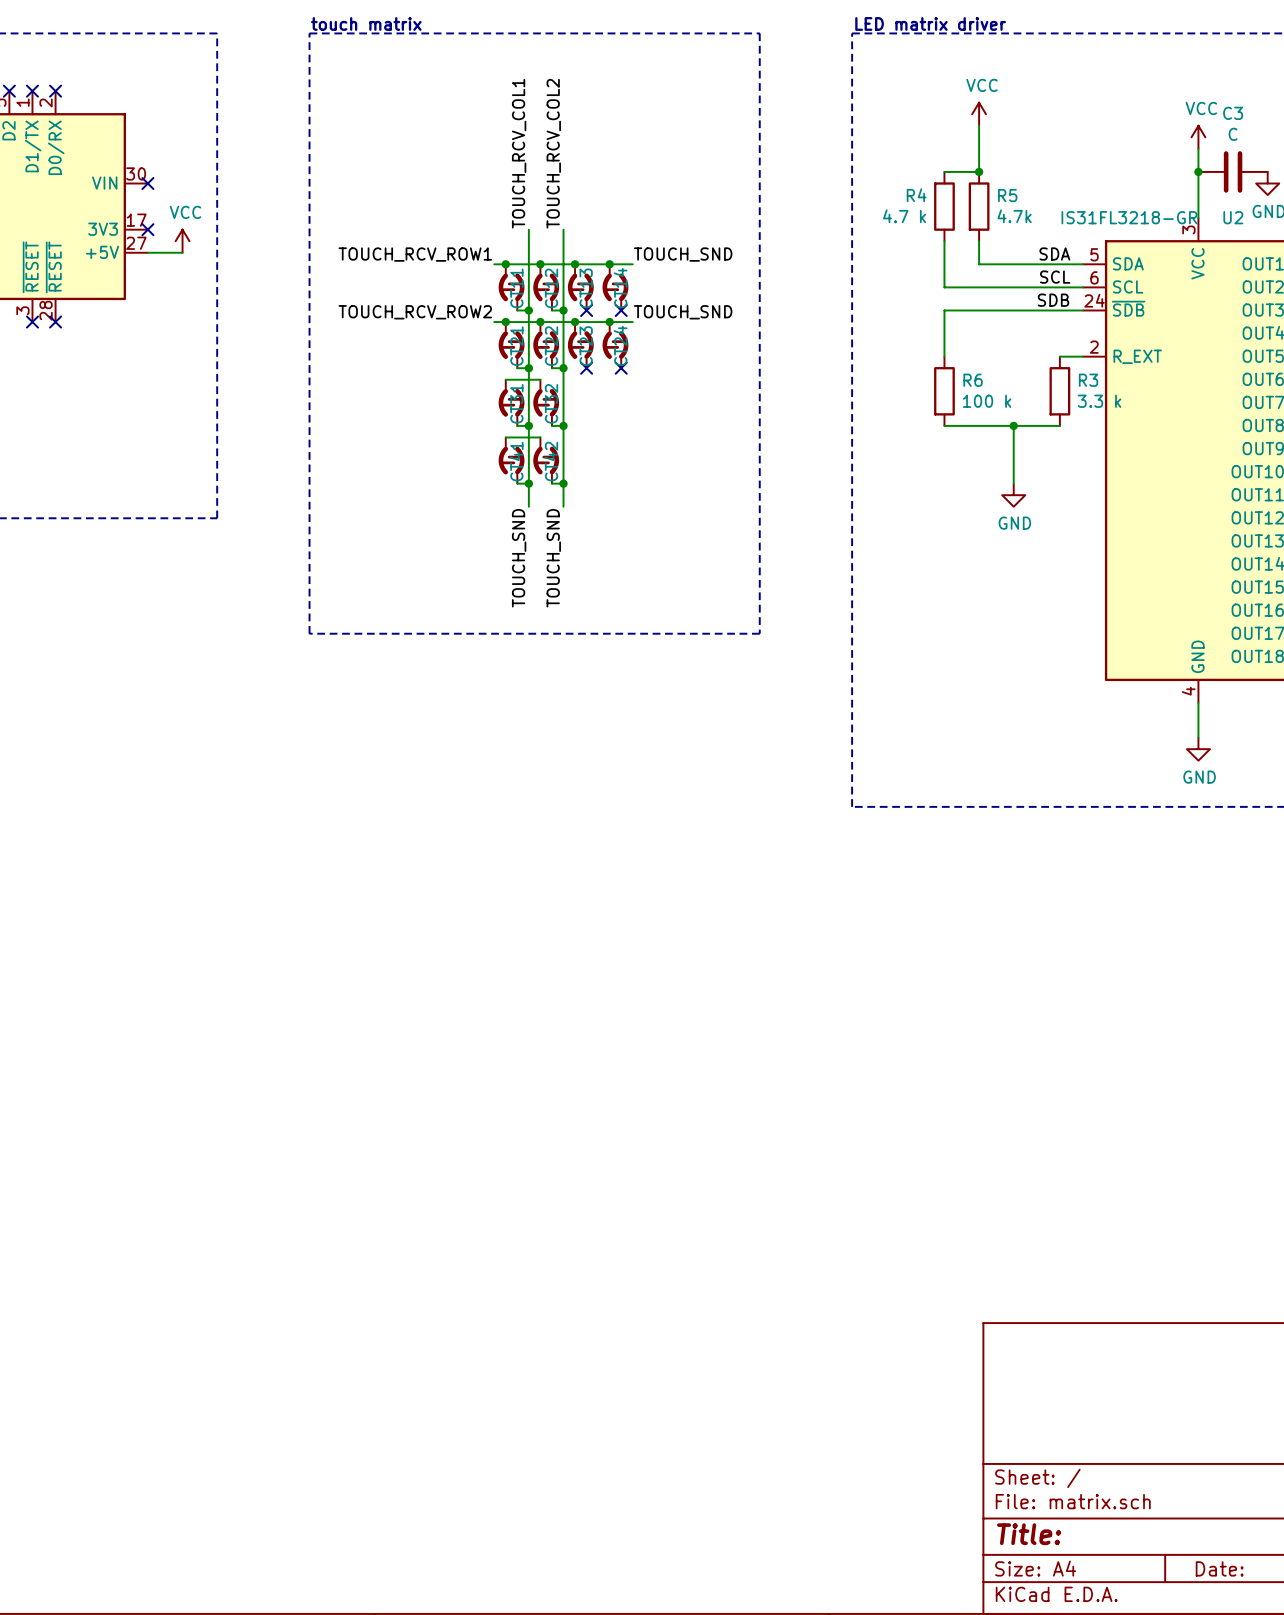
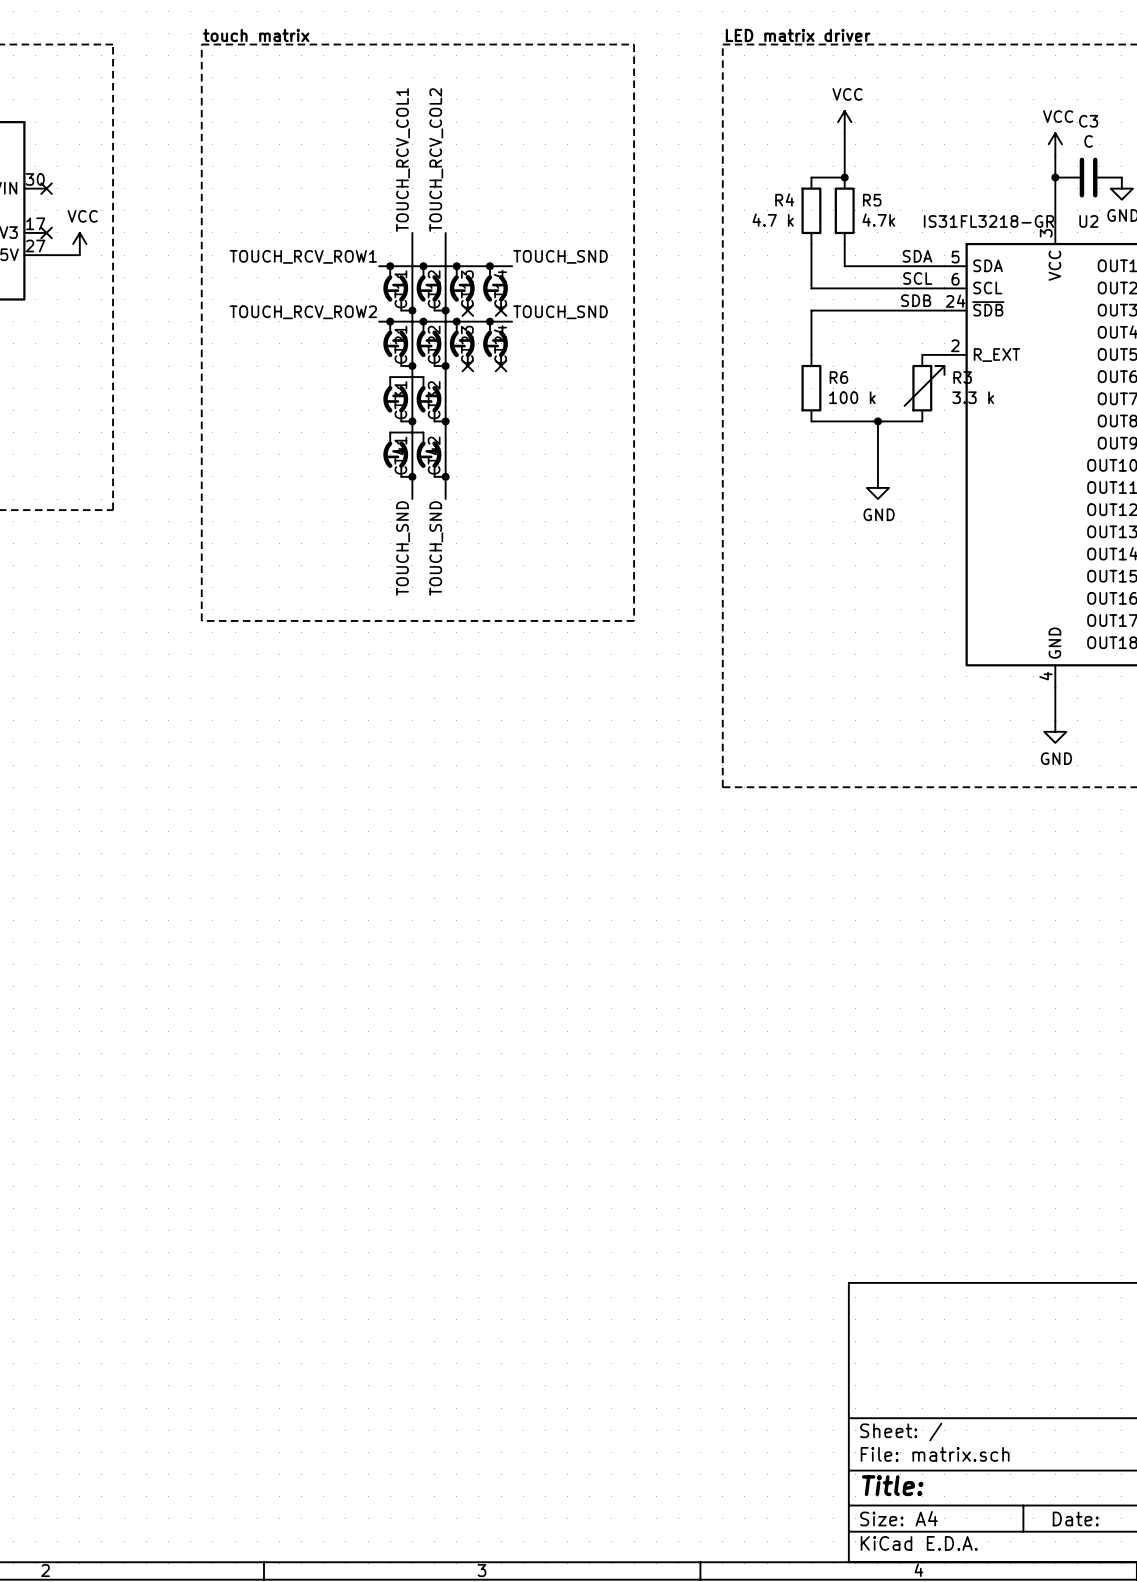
R3 symbol: [1049, 356, 1071, 426] -> [904, 354, 945, 422]

